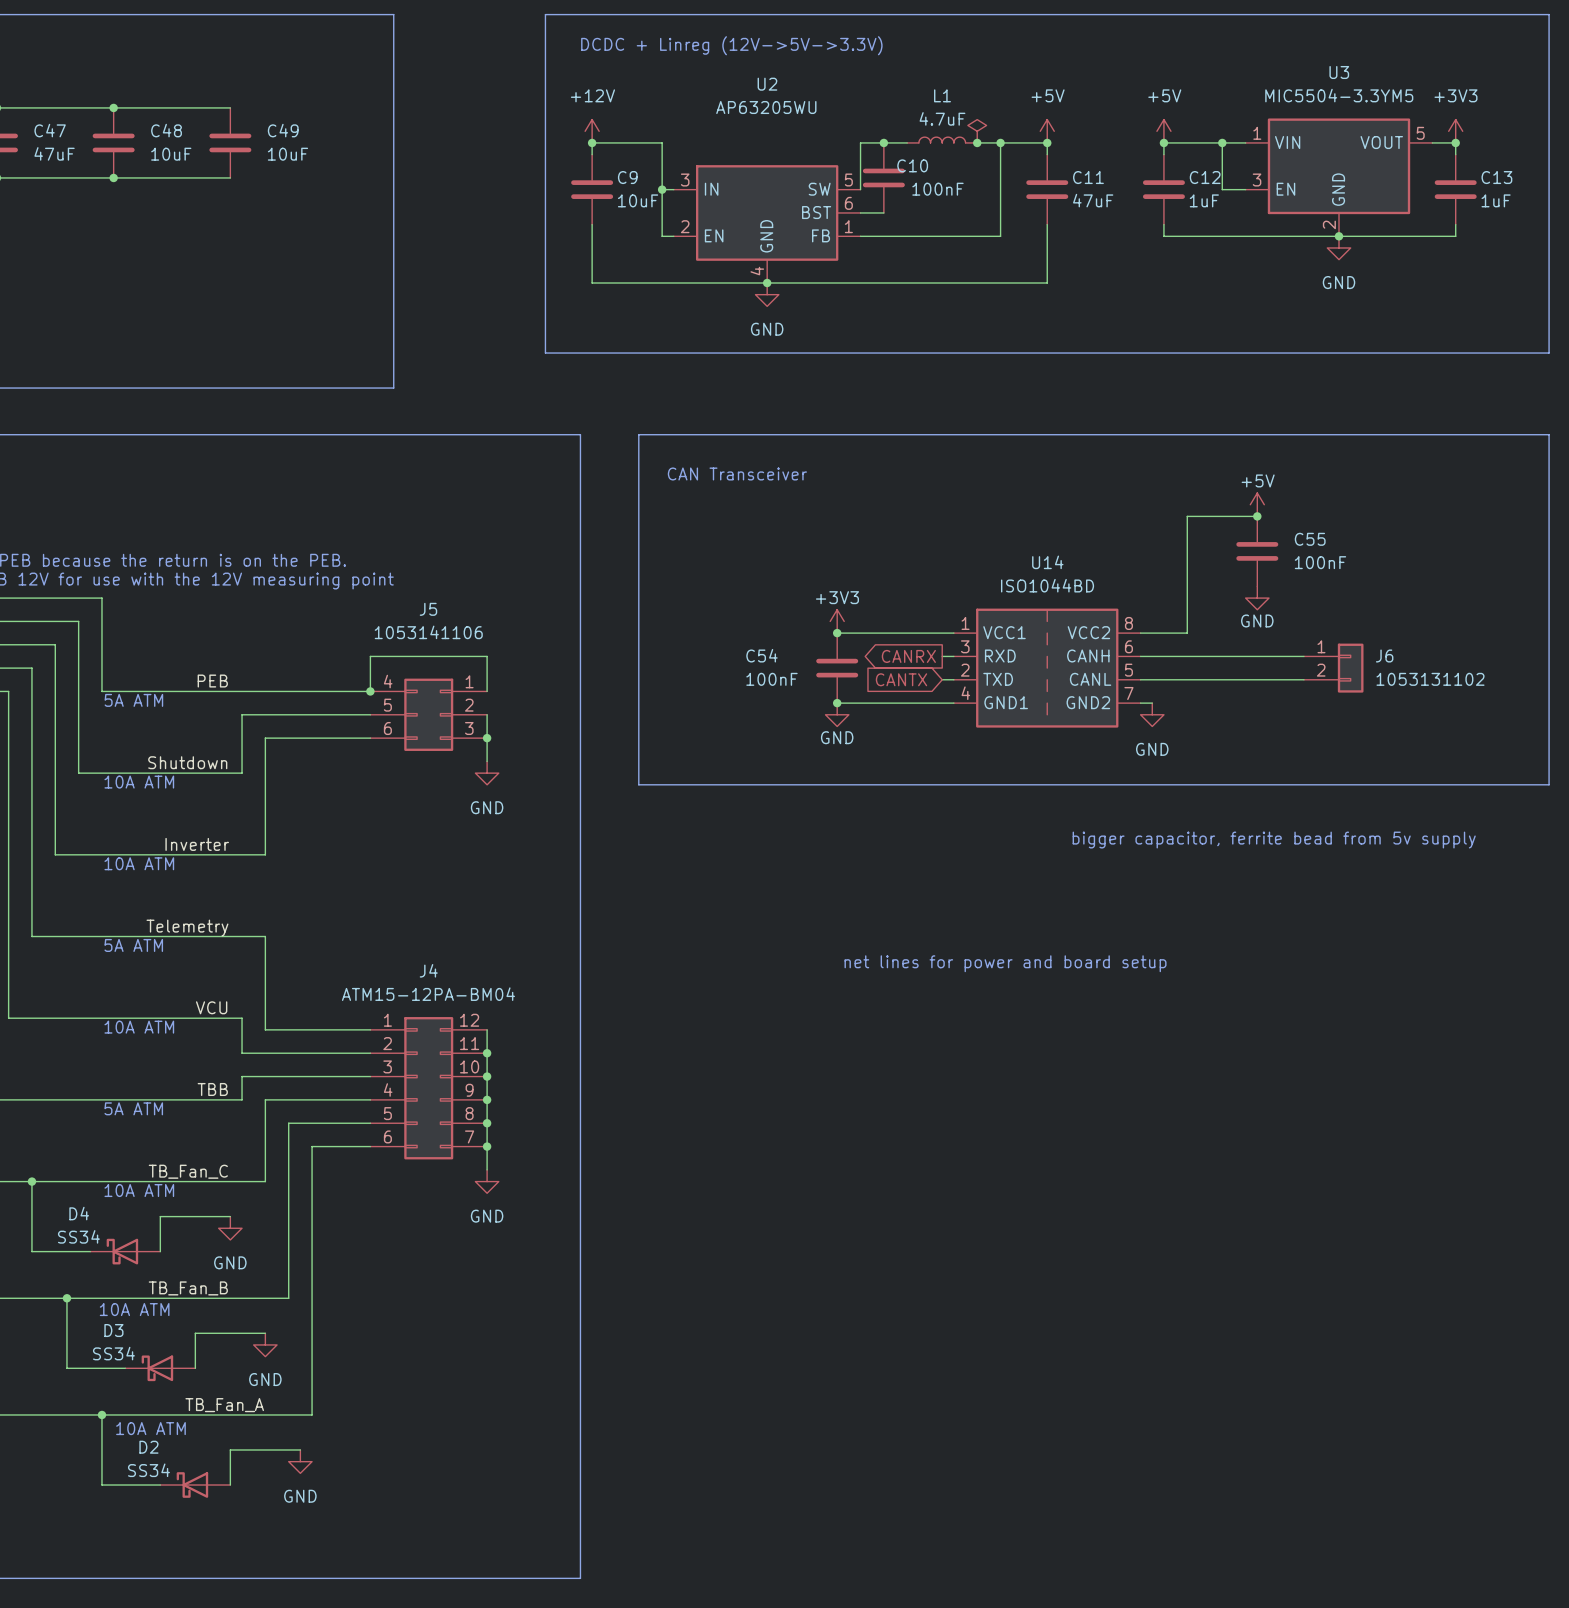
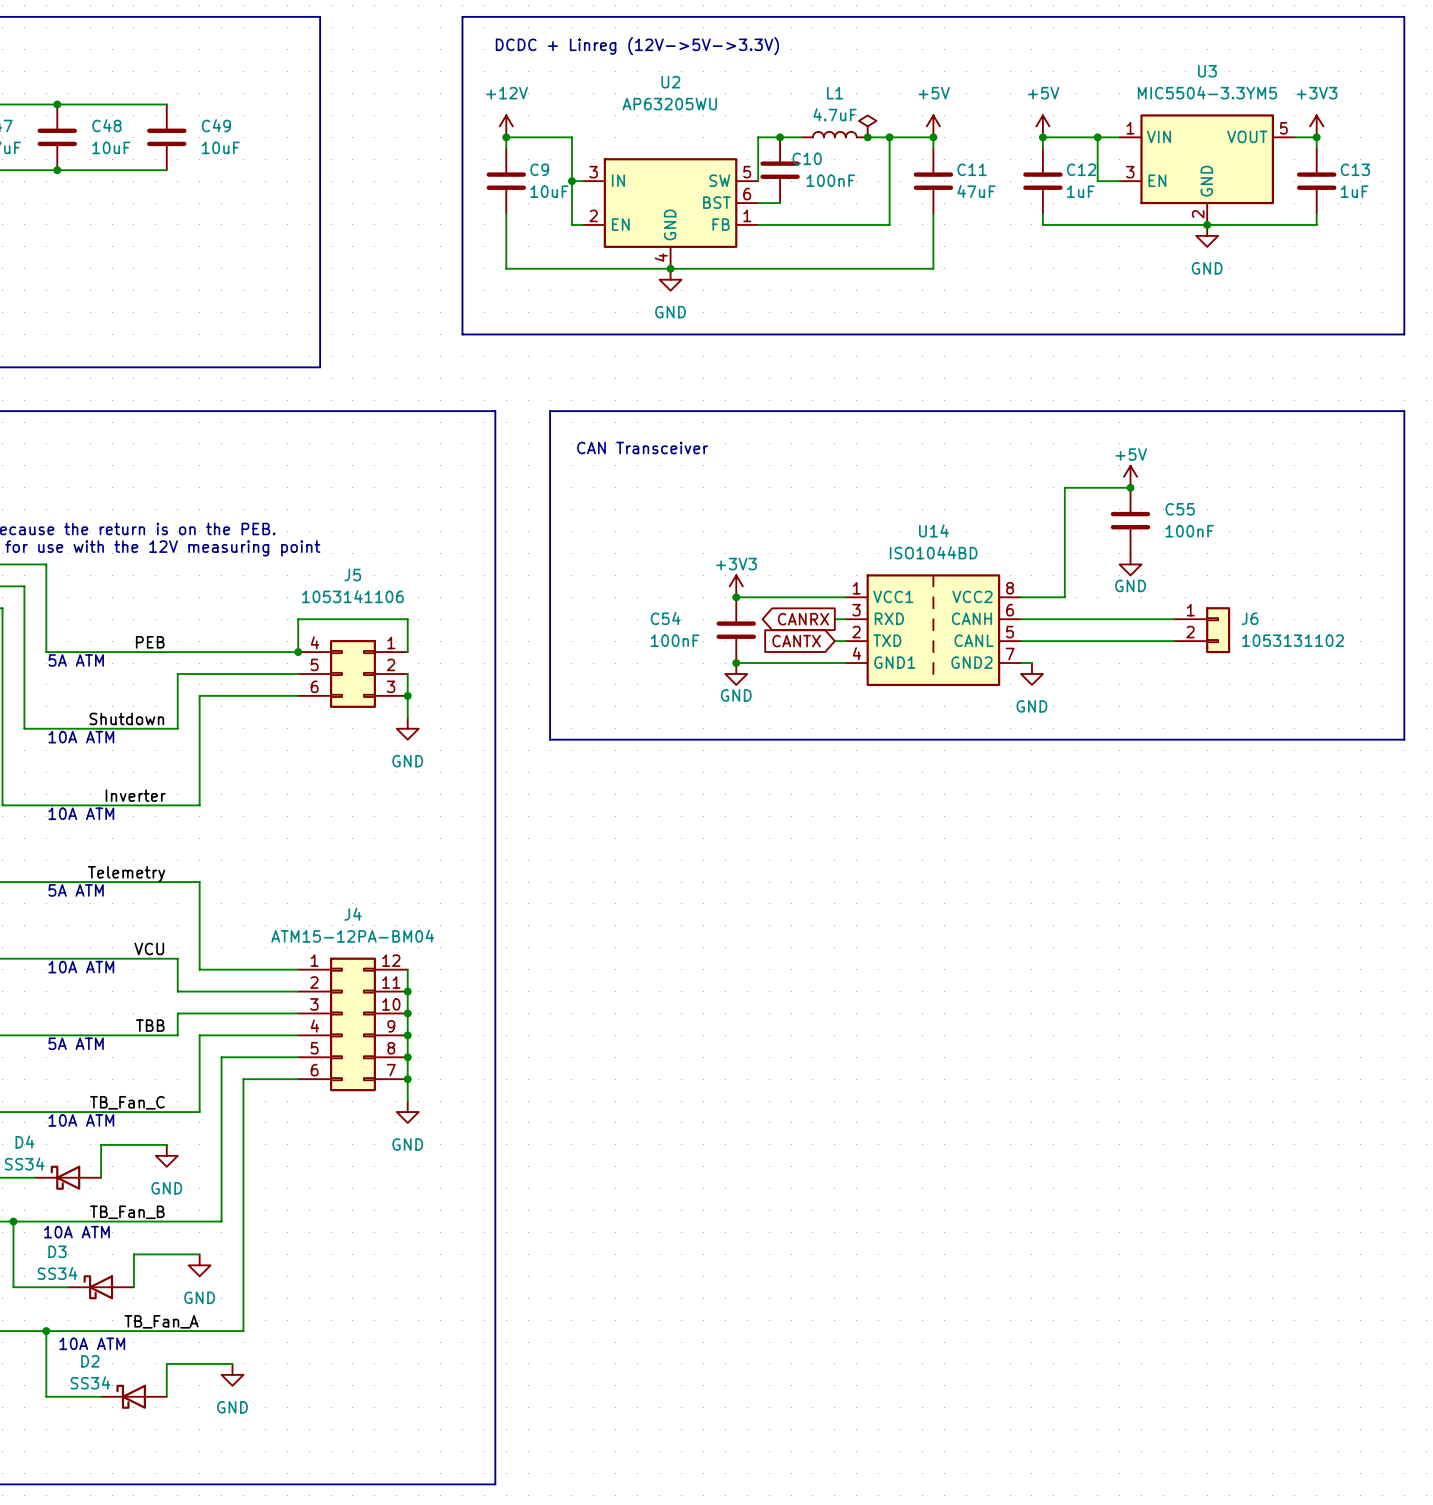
text: bigger capacitor, ferrite bead from 5v supply (1274, 840) -> none
text: net lines for power and board setup (1005, 963) -> none

